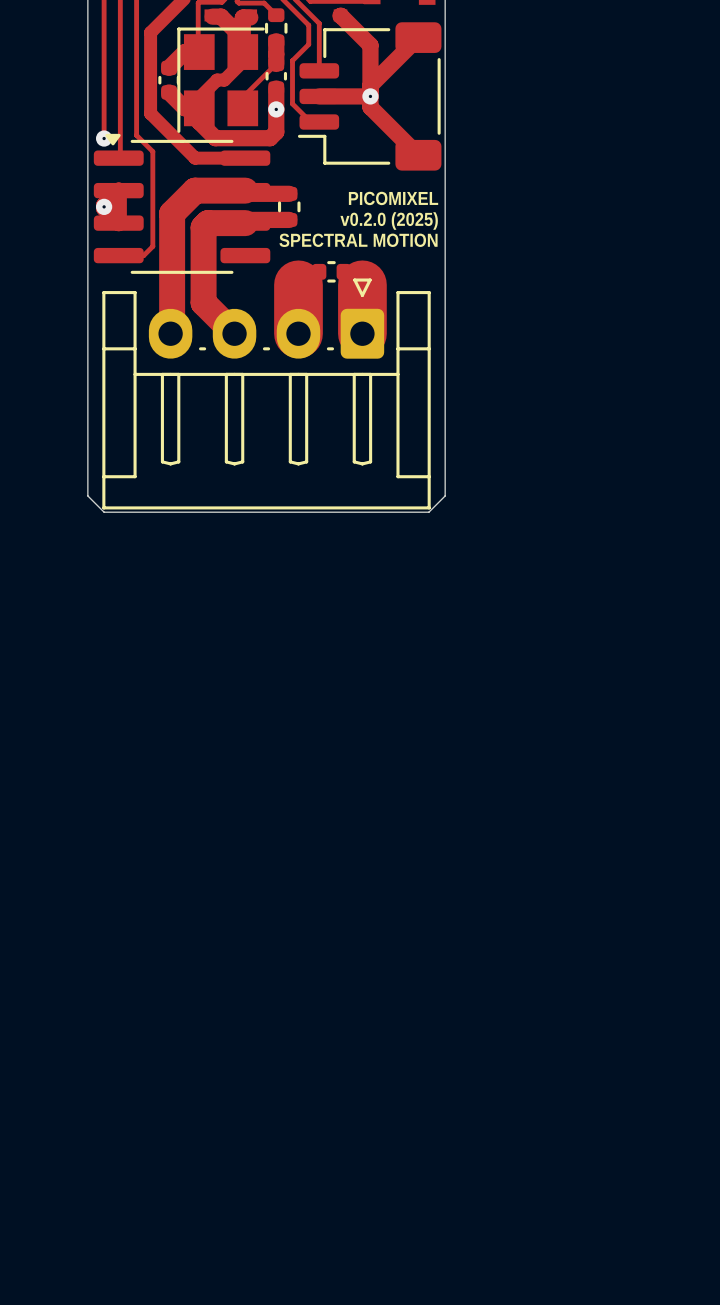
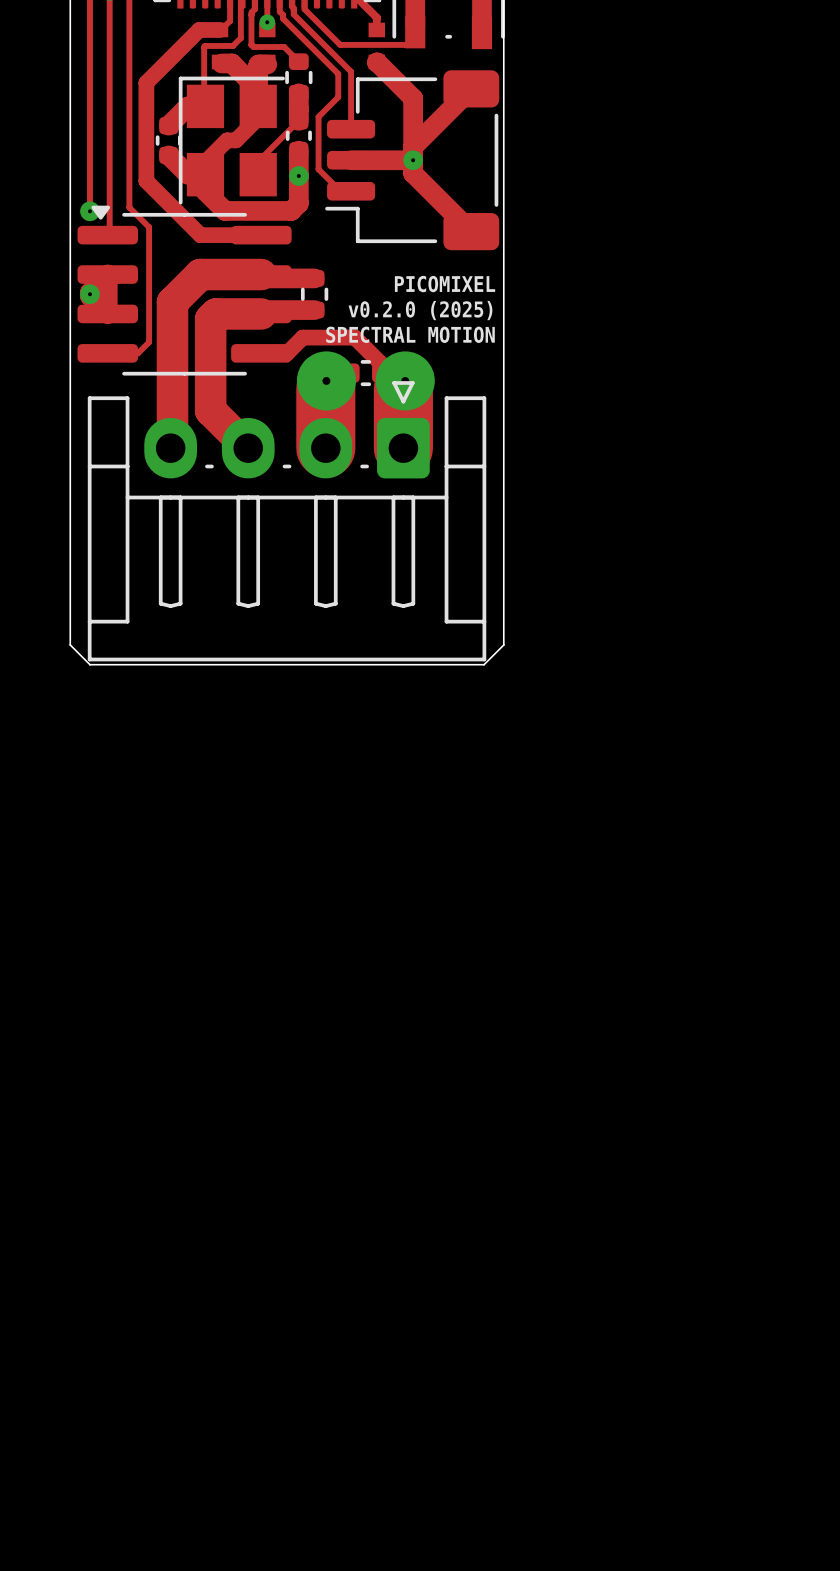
track: none -> (261, 353) (287, 353) (302, 337) (354, 337) (380, 363) (380, 373)
via: none -> (326, 380)
via: none -> (405, 380)

